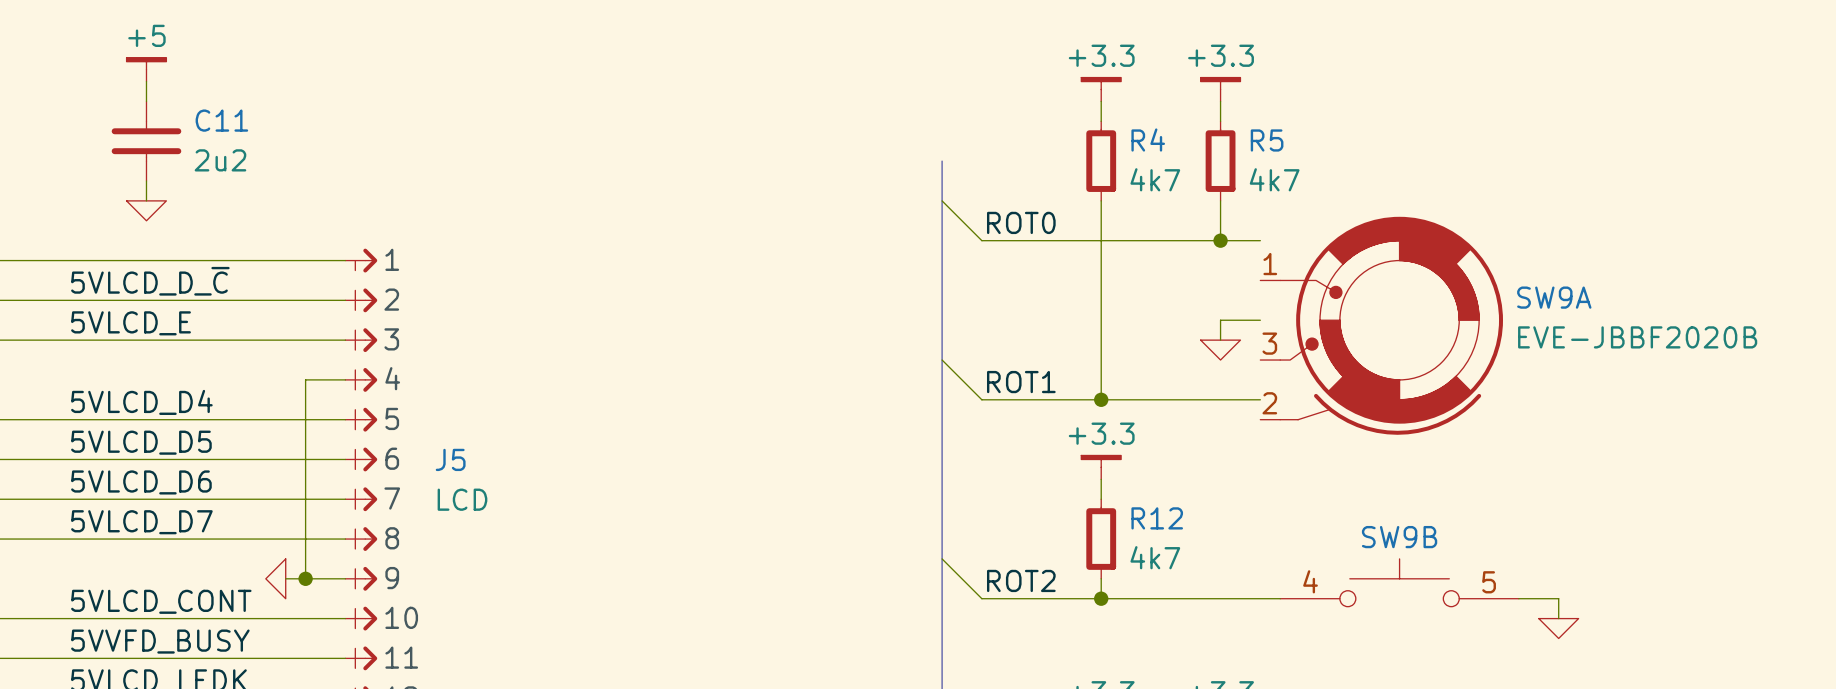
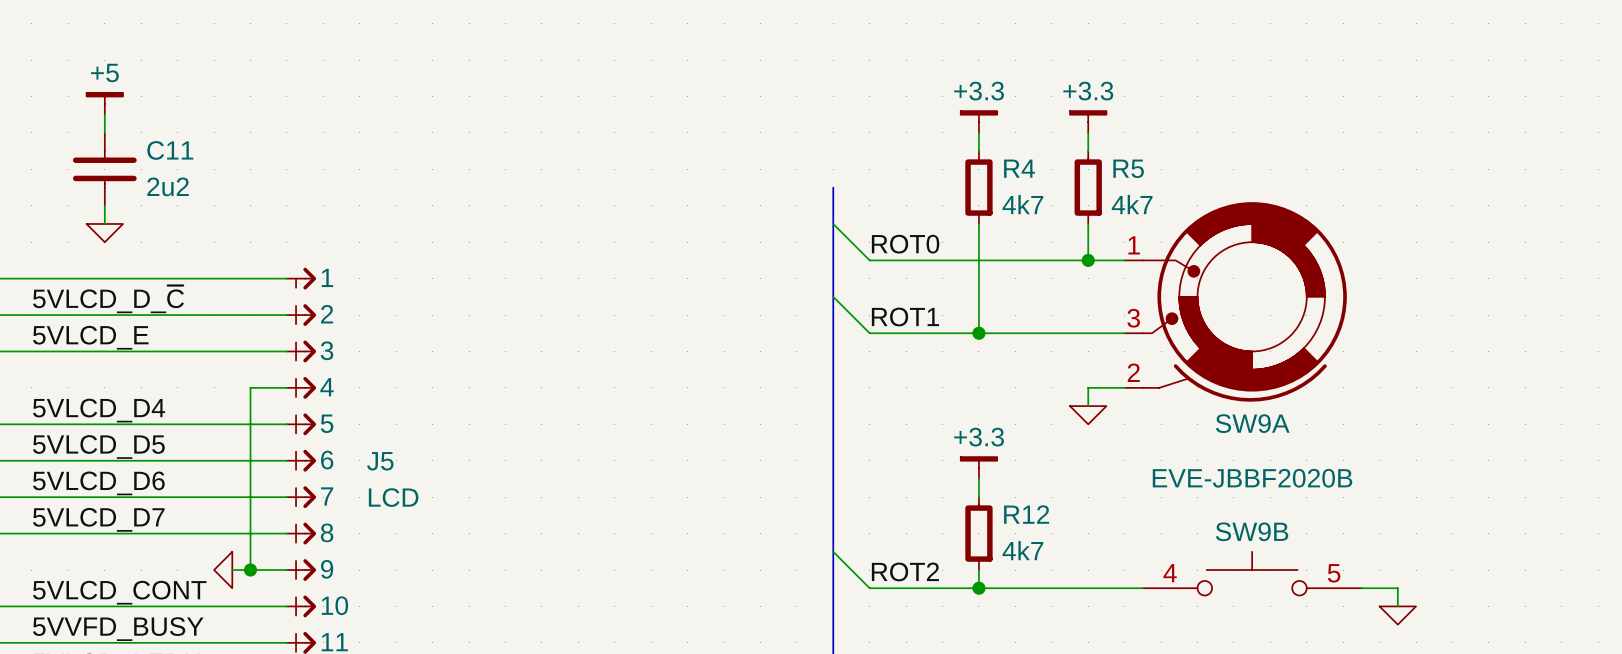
SW9A name position: SW9A (1554, 297) -> SW9A (1252, 423)
wire: (1101, 320) (1101, 399) -> none
wire: (1220, 320) (1220, 340) -> (1088, 333) (869, 333) (833, 296)
SW9A position: (1381, 325) -> (1235, 301)
SW9A value position: EVE-JBBF2020B (1637, 337) -> EVE-JBBF2020B (1252, 478)
power symbol position: (1220, 350) -> (1088, 415)
wire: (942, 360) (981, 399) (1260, 399) -> none
wire: none -> (1124, 387) (1088, 387) (1088, 406)
label position: ROT1 (1021, 382) -> ROT1 (905, 317)
junction position: (1101, 399) -> (978, 333)

